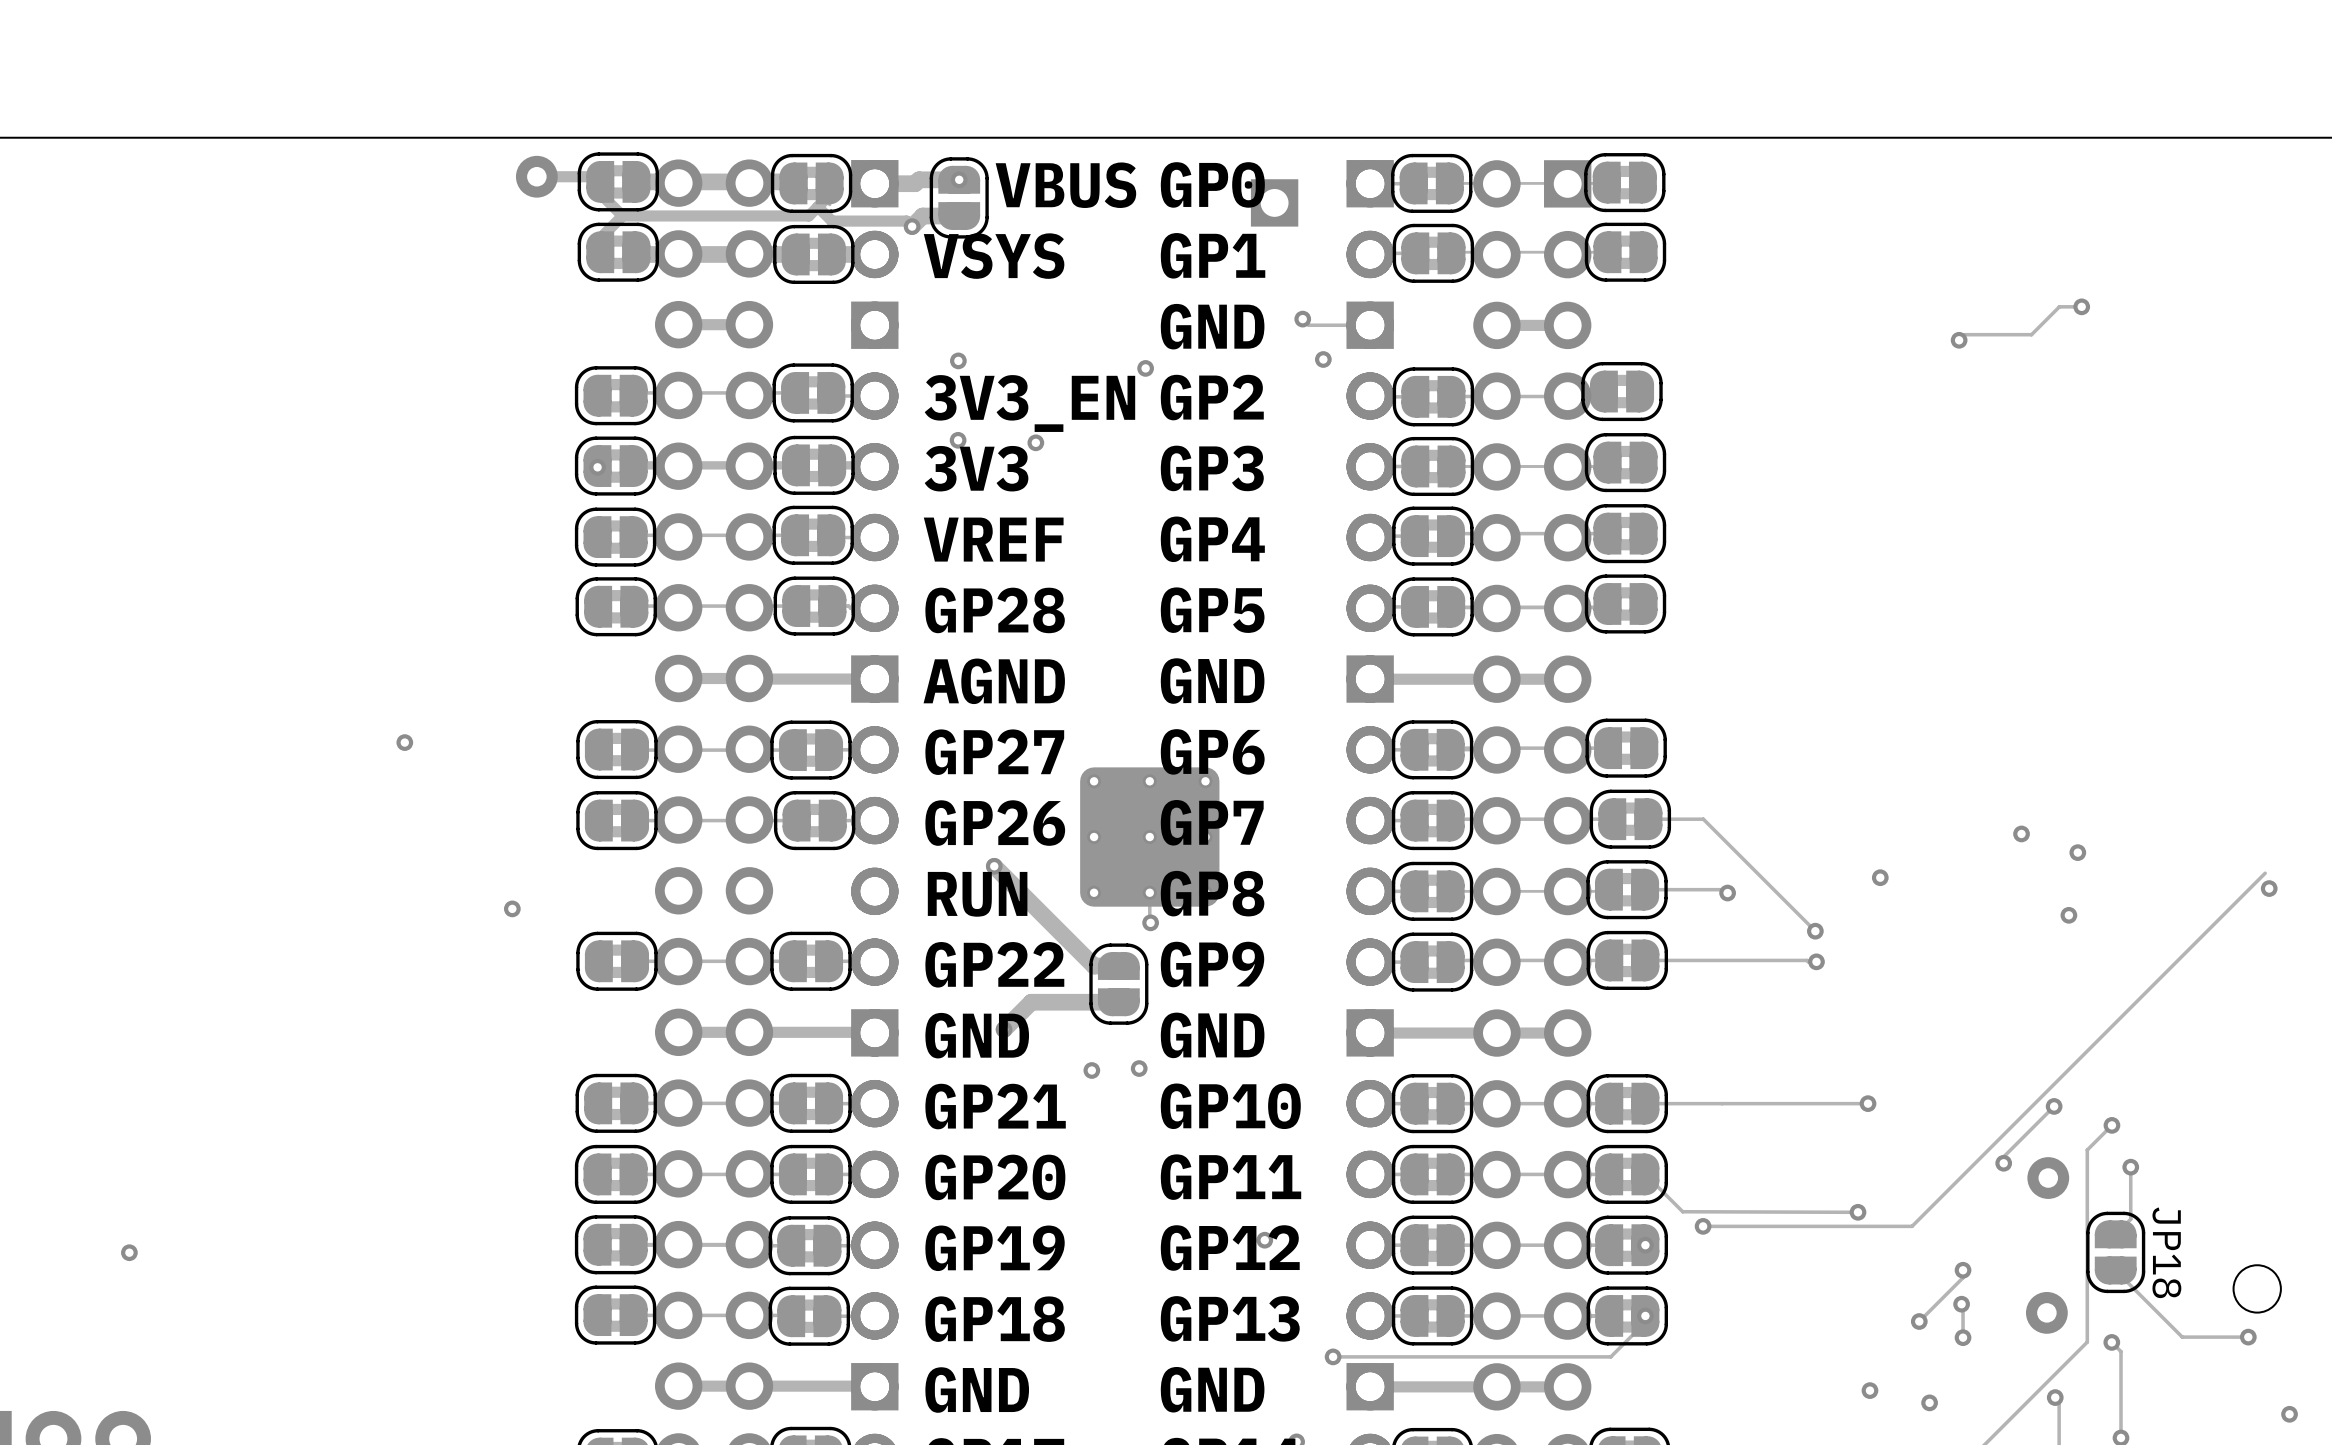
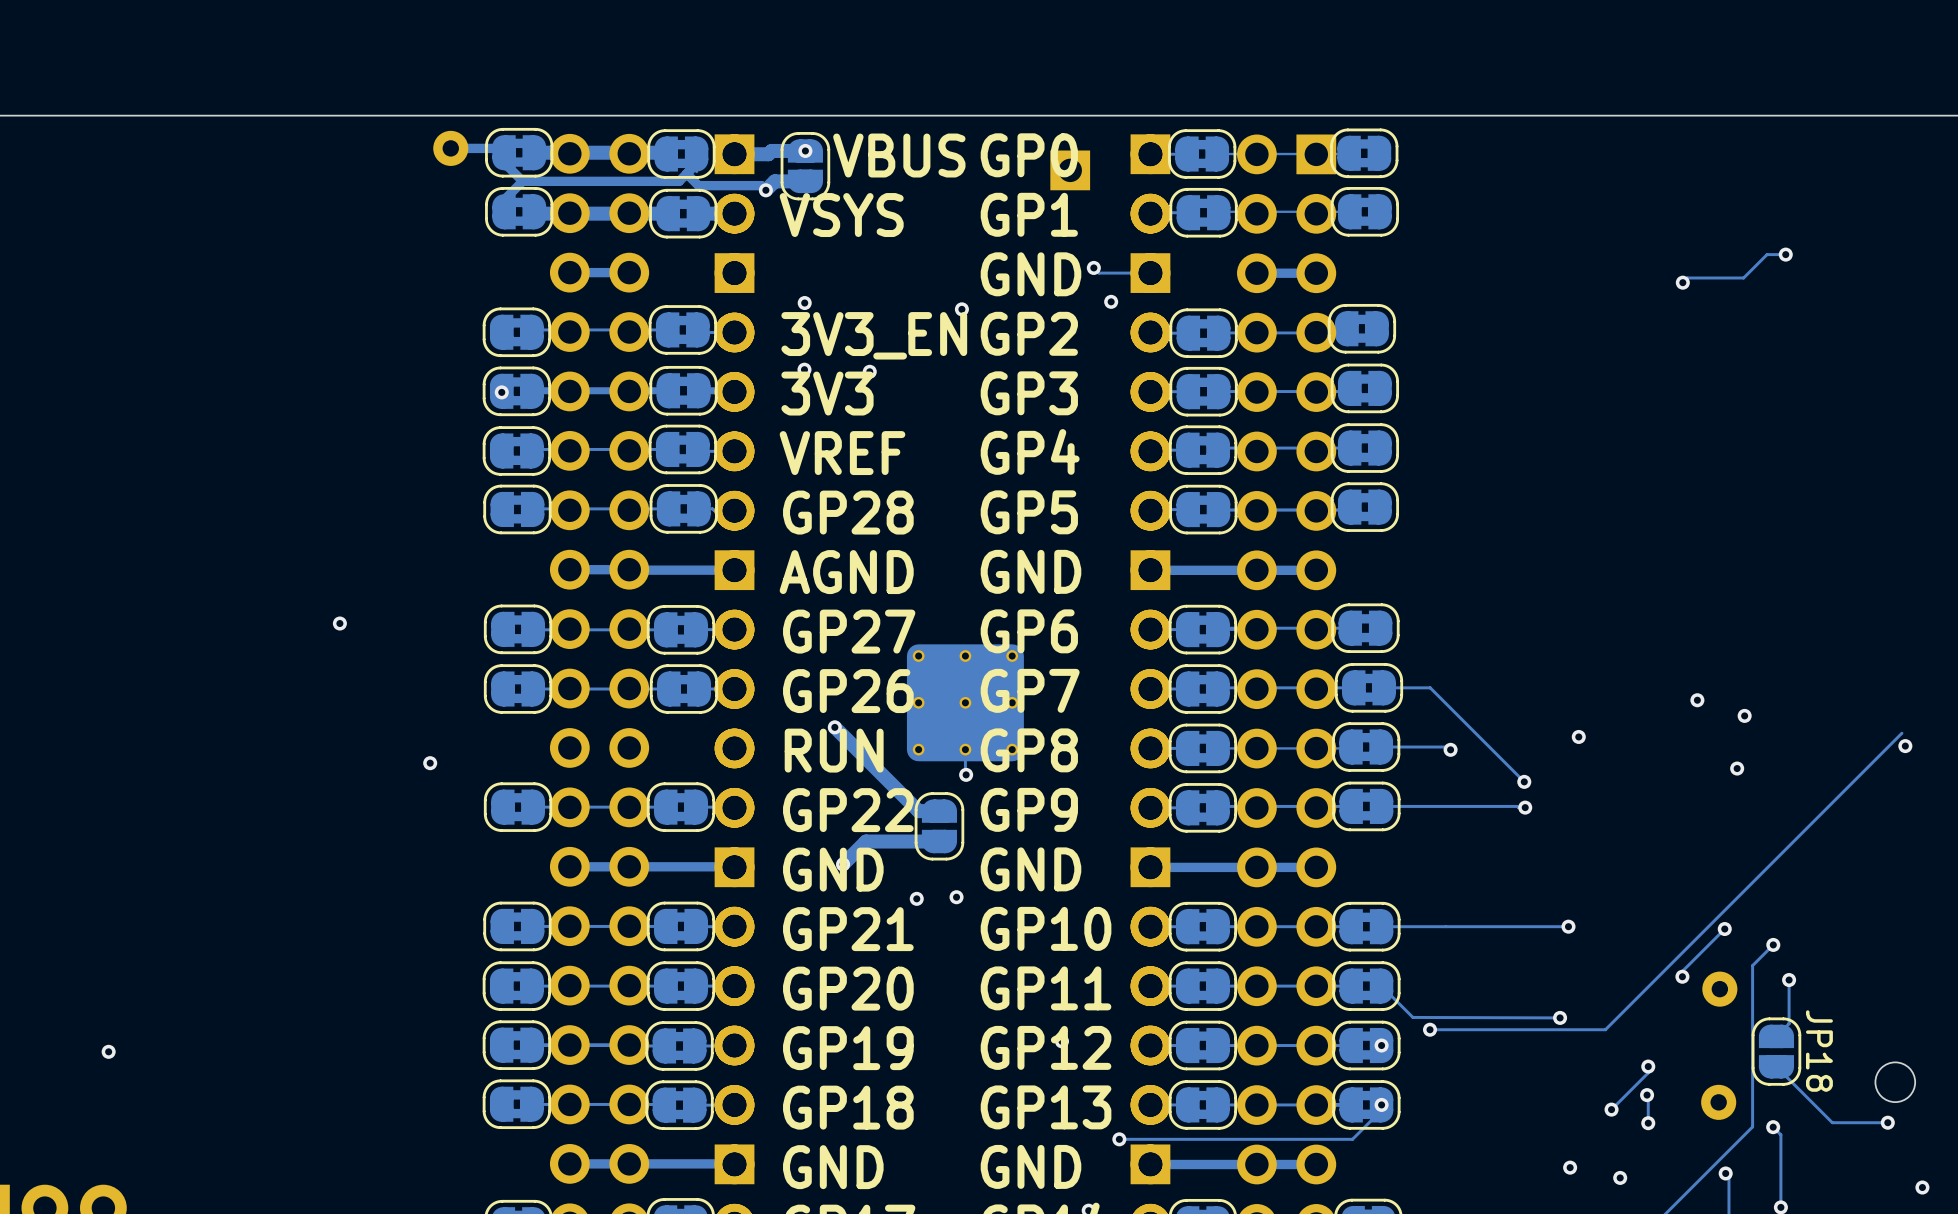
via: none -> (1785, 254)
track: (2081, 306) (2059, 306) (2031, 334) (1964, 334) (1959, 340) -> (1785, 254) (1767, 254) (1743, 277) (1687, 277) (1682, 282)
via: (2081, 306) -> none
via: none -> (1682, 282)
via: (1959, 340) -> none

